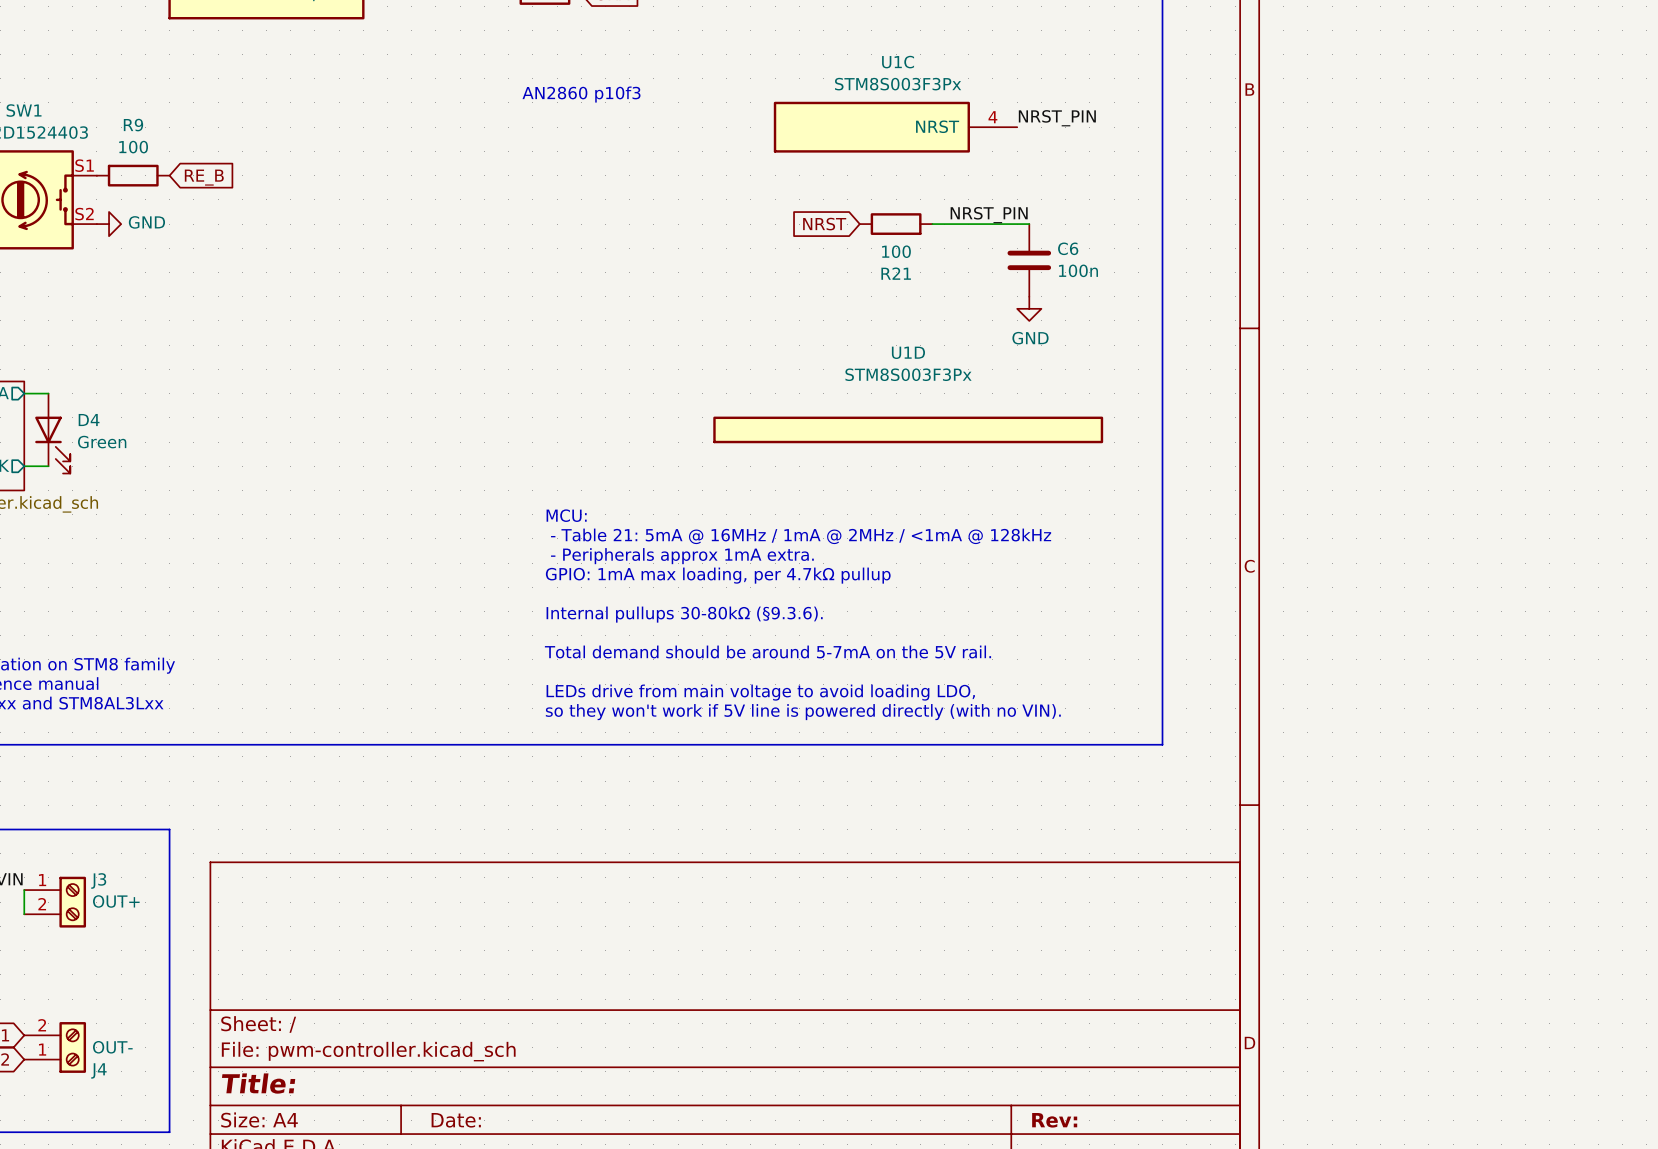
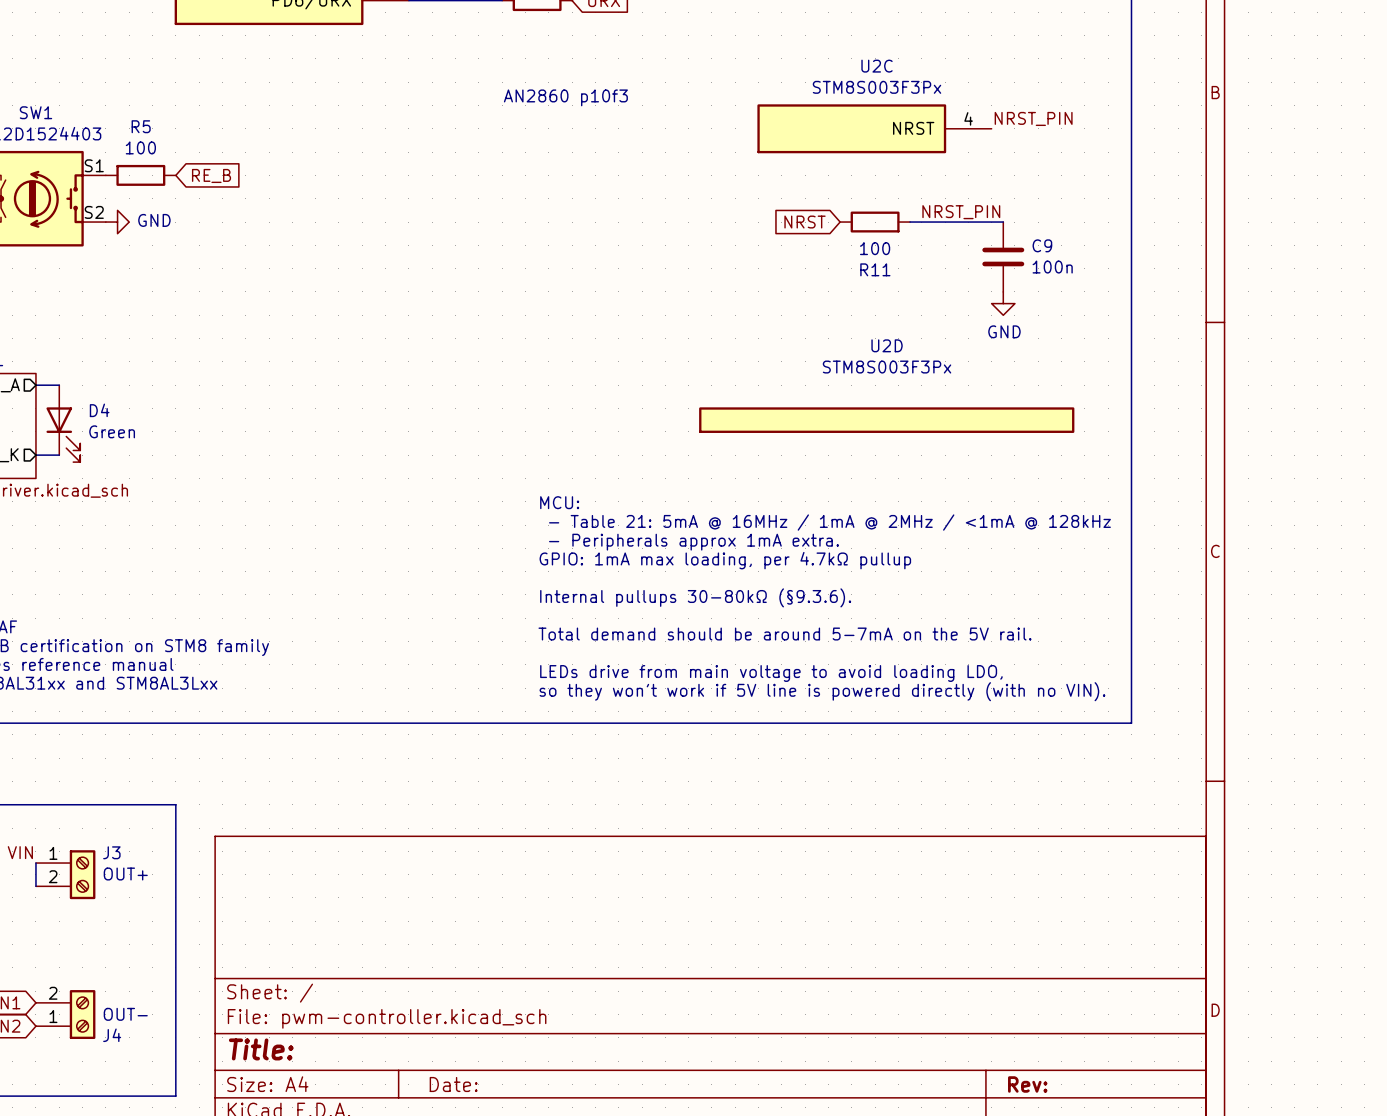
U1C name: U1C (898, 62) -> U2C (877, 66)
R9 name: R9 (133, 125) -> R5 (141, 126)
C6 name: C6 (1068, 248) -> C9 (1042, 245)
R21 name: R21 (896, 273) -> R11 (875, 269)
U1D name: U1D (908, 352) -> U2D (887, 345)

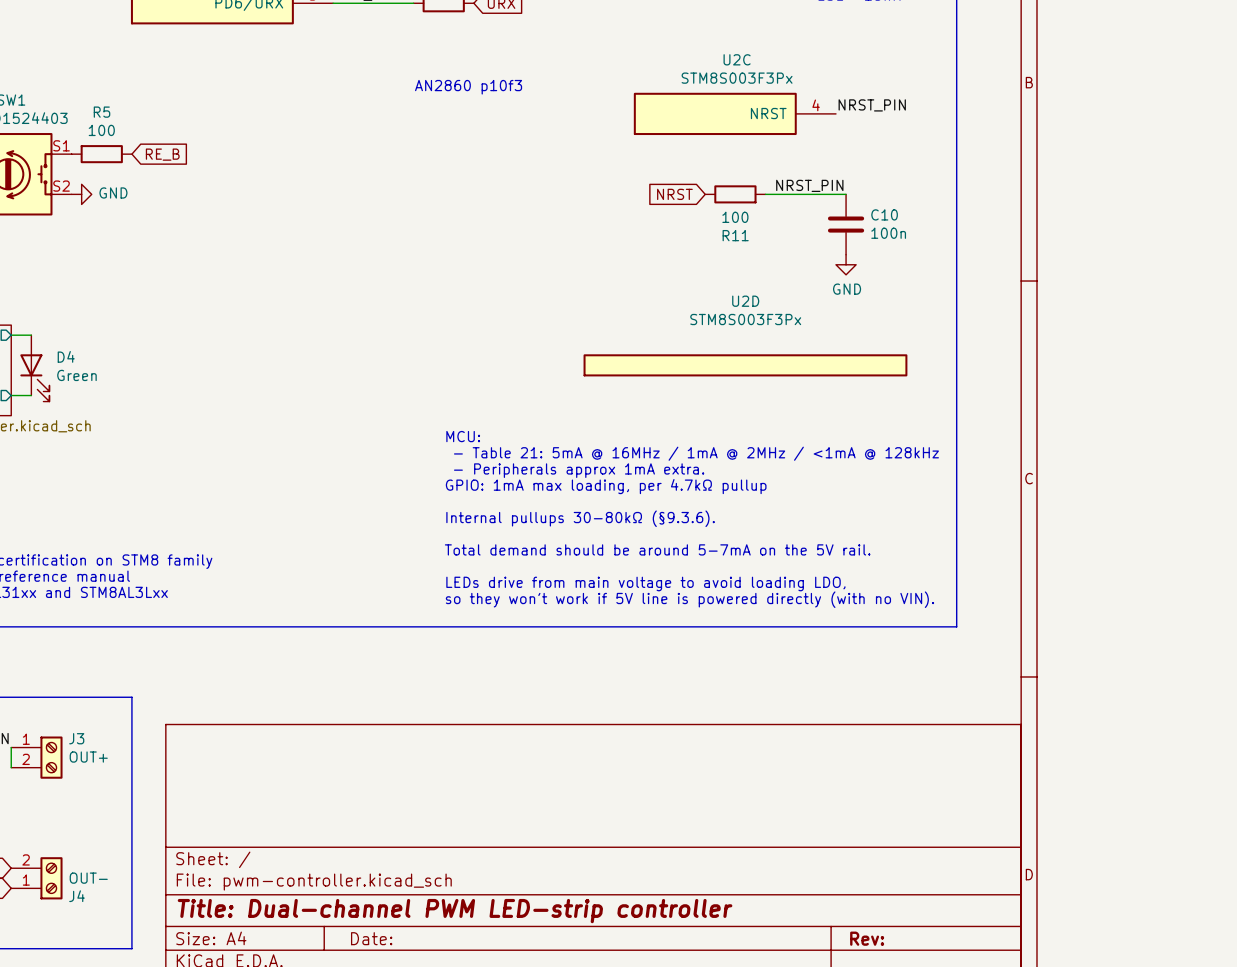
C9 name: C9 (1042, 245) -> C10 (884, 214)
title block: Title: (261, 1049) -> Title: Dual-channel PWM LED-strip controller (455, 911)

